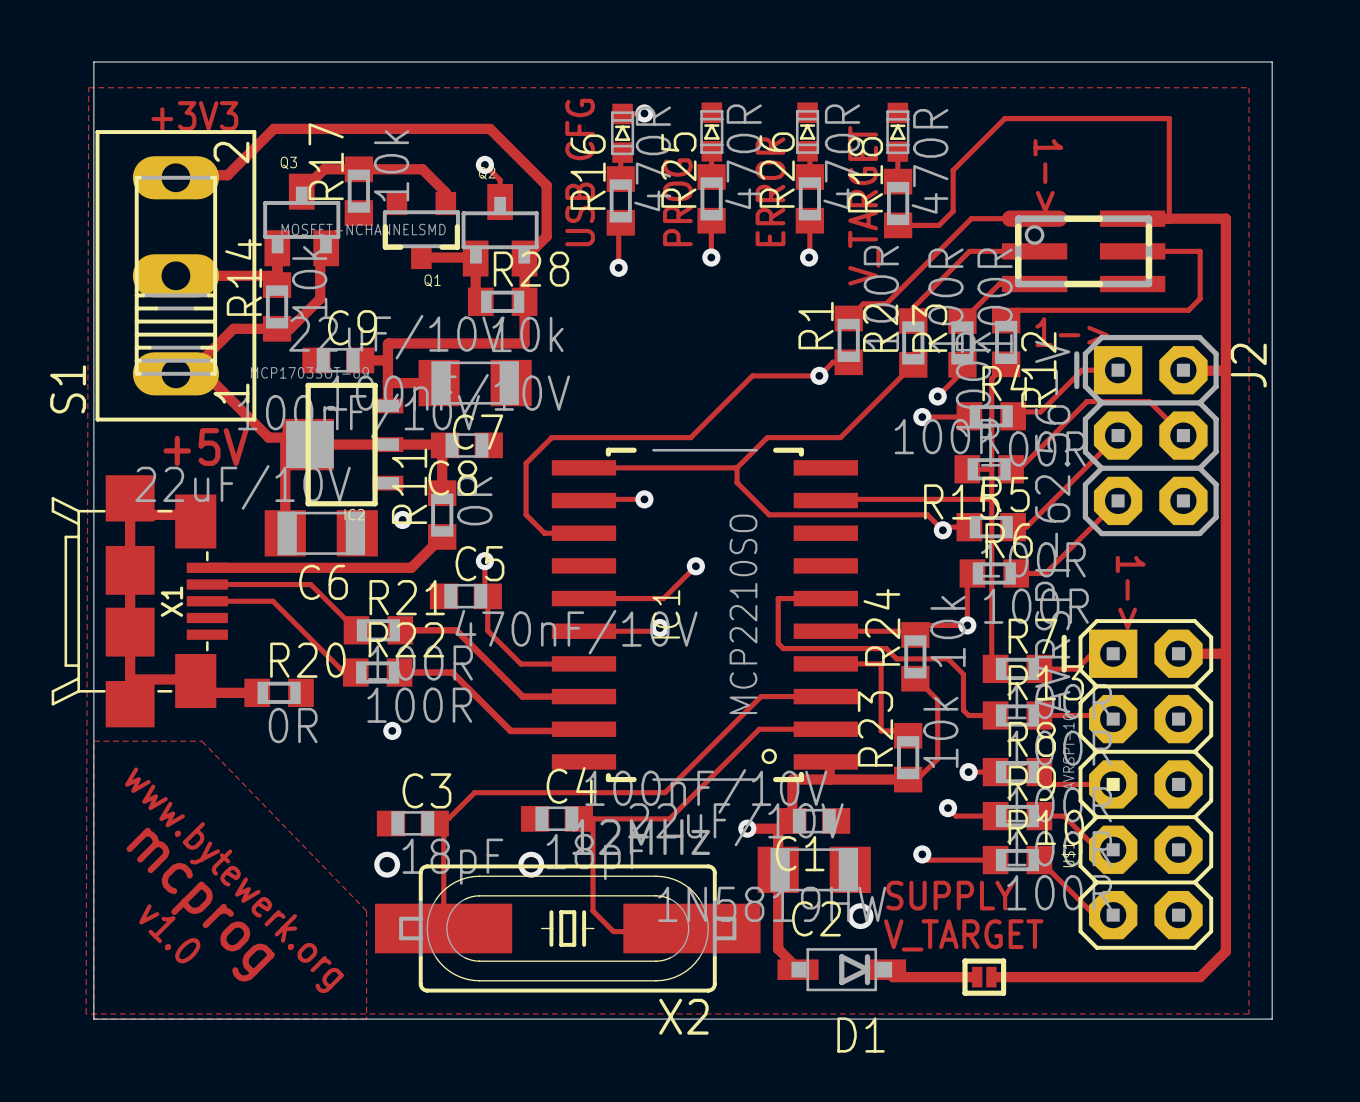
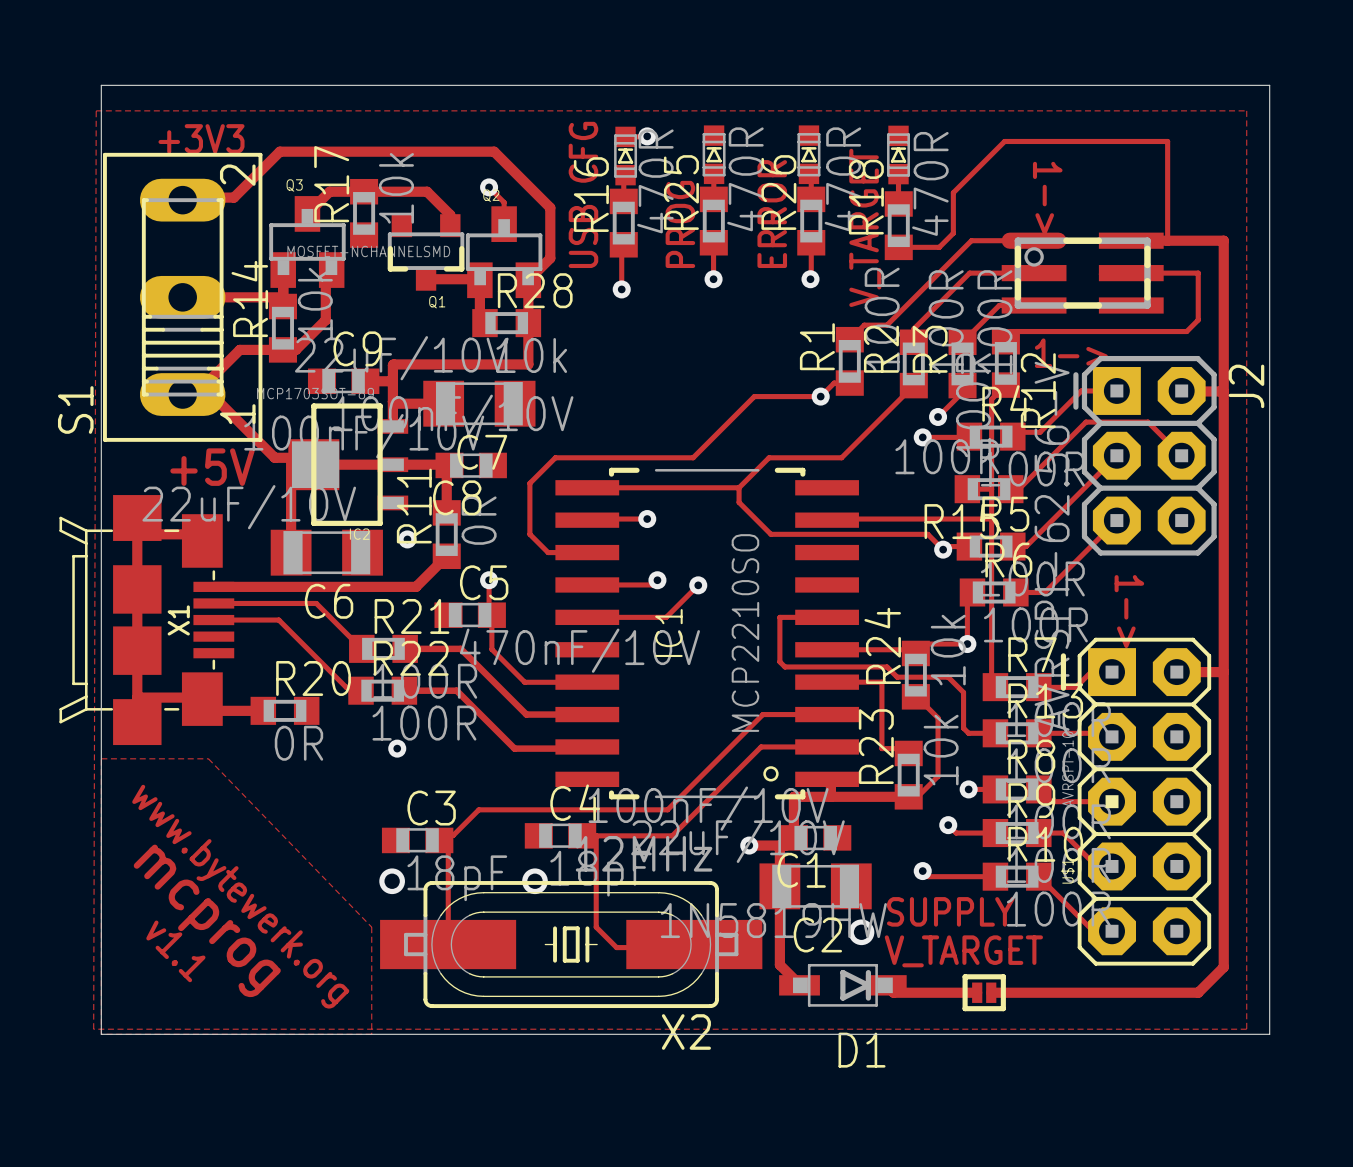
track: none -> (657, 580) (652, 584) (587, 584)
track: (659, 628) (656, 631) (583, 631) -> none
via position: (659, 628) -> (657, 580)
text: v1.0 (169, 933) -> v1.1 (175, 951)

